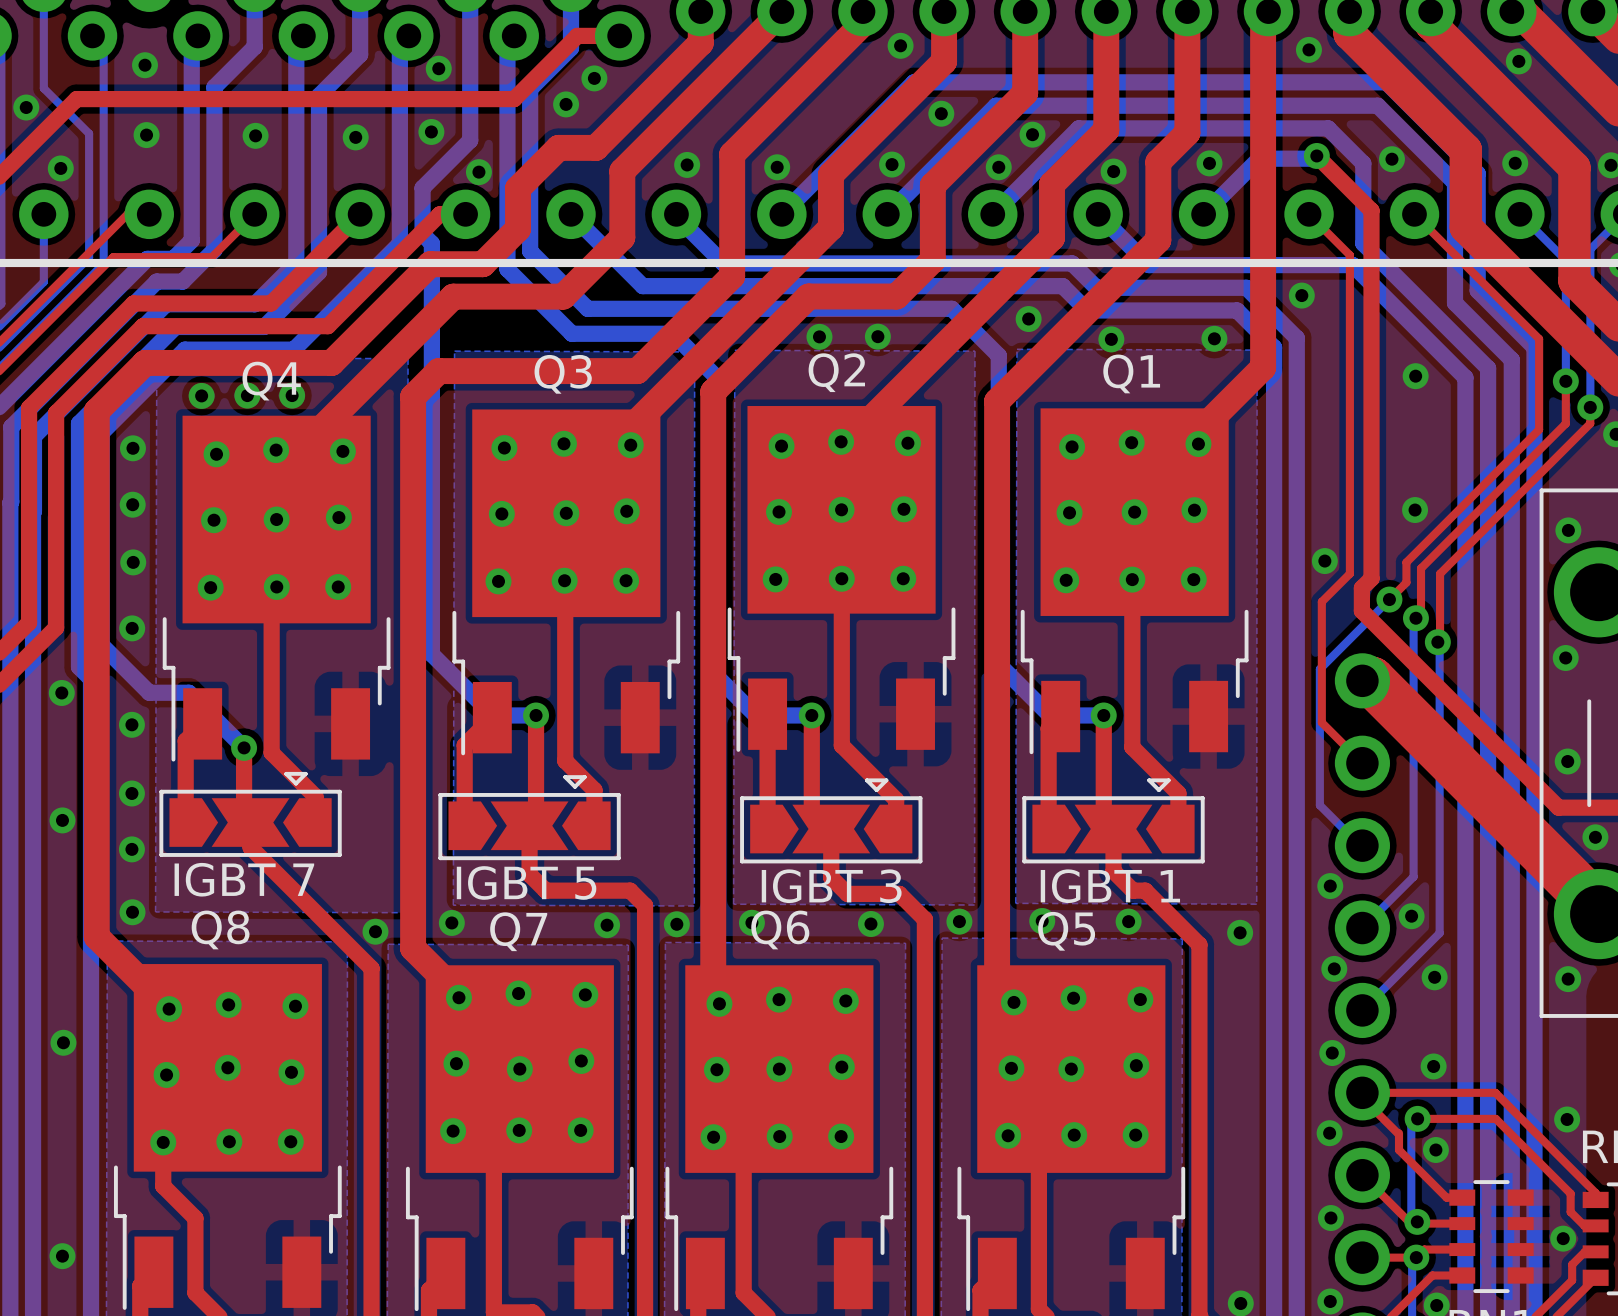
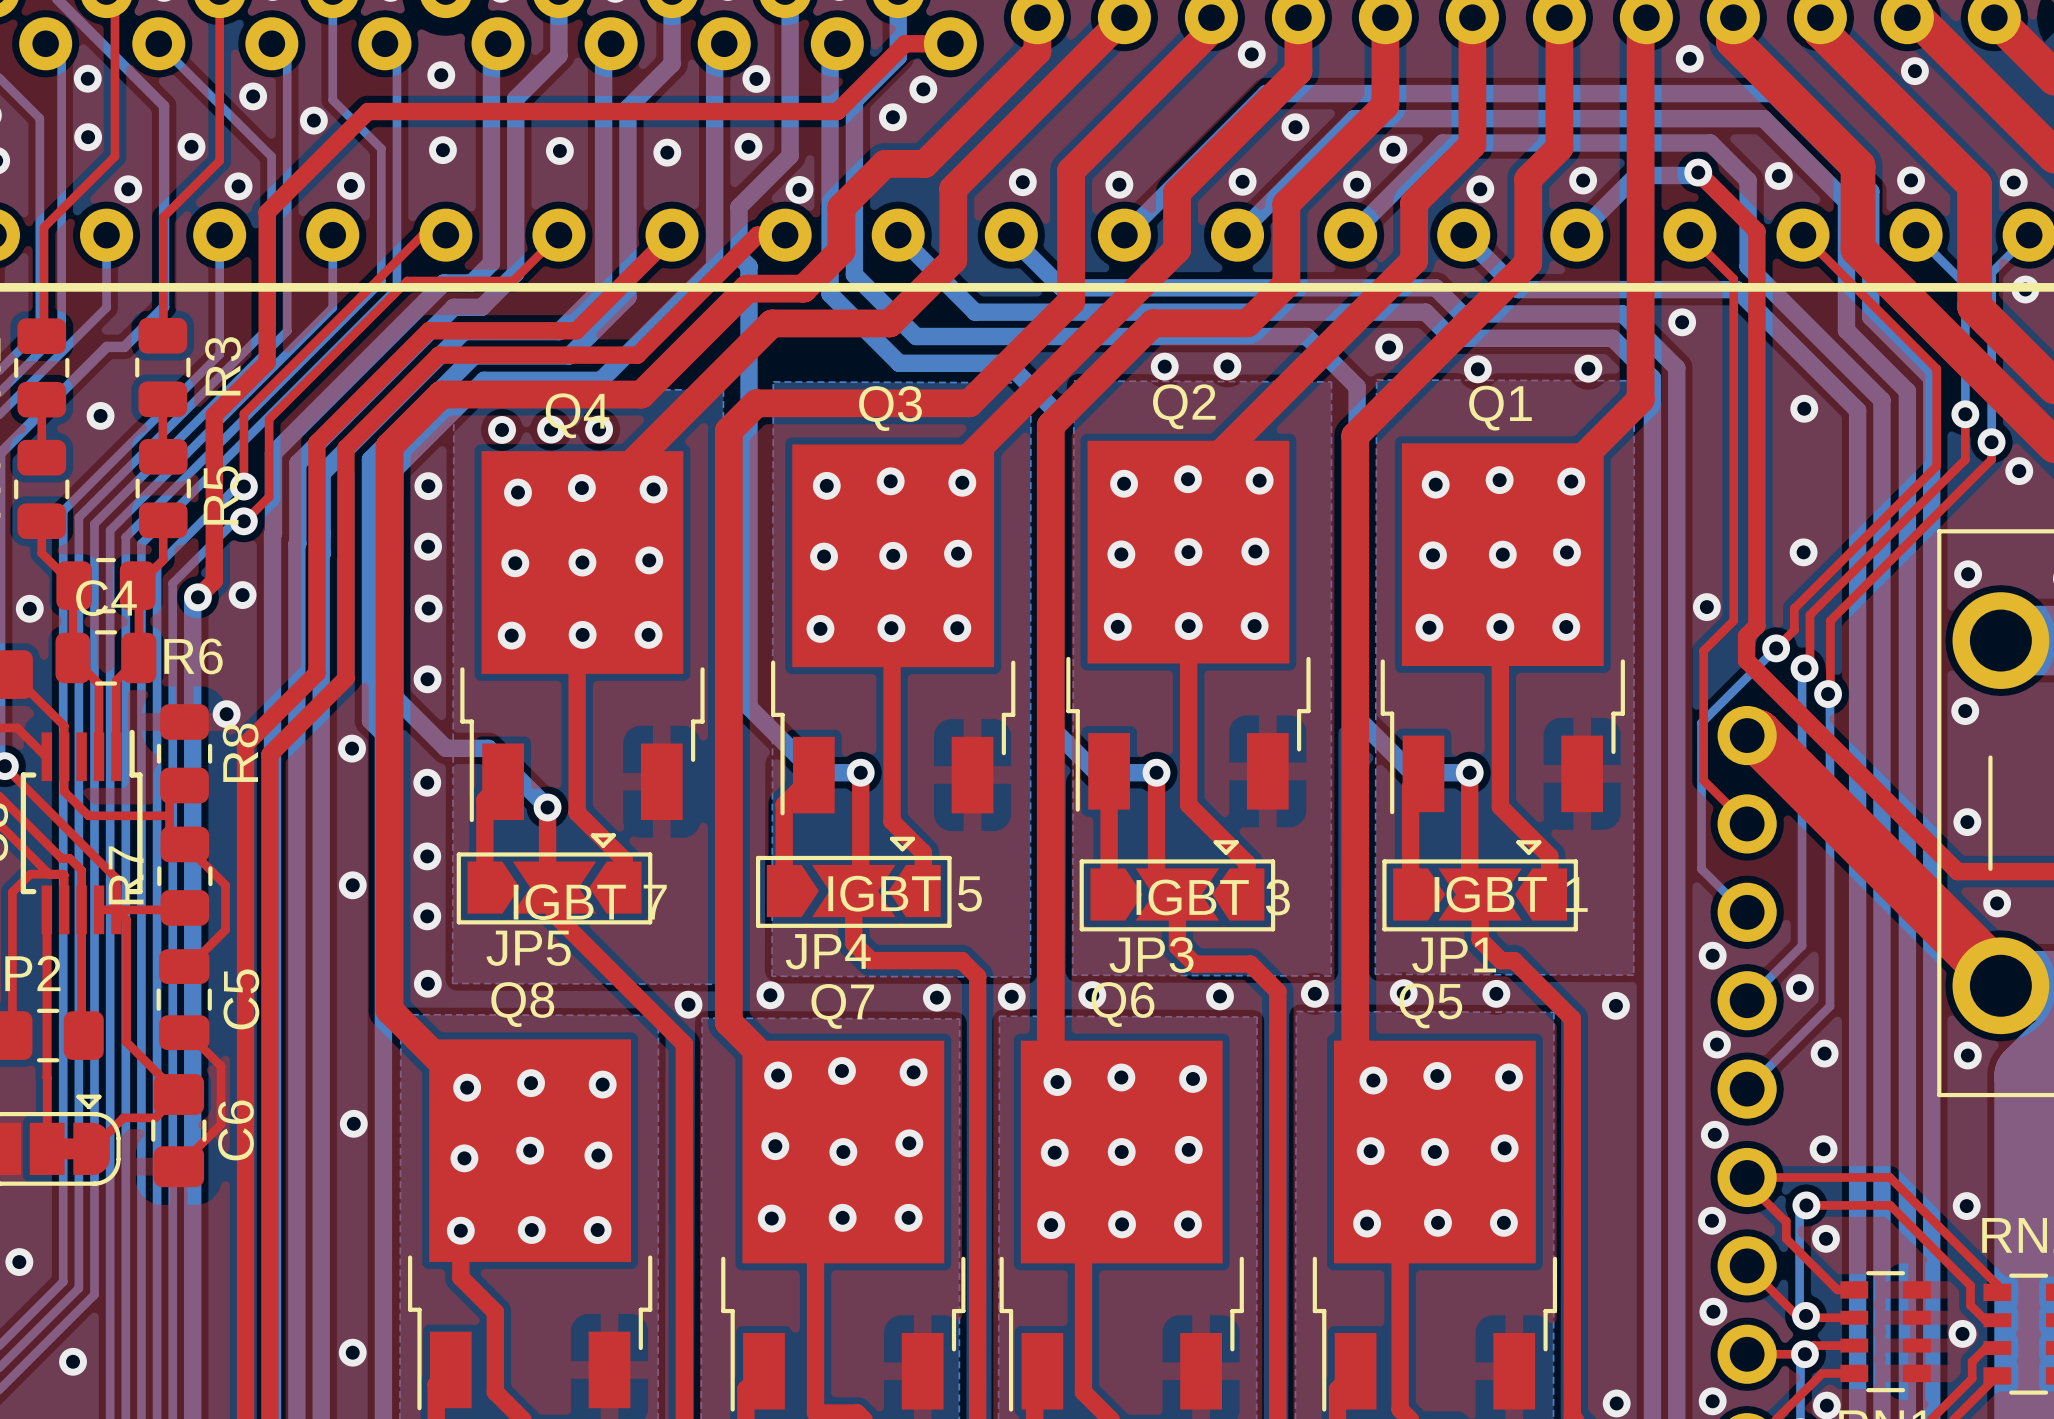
text position: IGBT 7 (244, 879) -> IGBT 7 (590, 902)
text position: IGBT 5 (526, 882) -> IGBT 5 (905, 893)
JP5 name: none -> JP5 (528, 948)
JP4 name: none -> JP4 (828, 951)
text position: IGBT 3 (831, 886) -> IGBT 3 (1213, 897)
text position: IGBT 1 (1110, 886) -> IGBT 1 (1511, 894)
JP3 name: none -> JP3 (1151, 954)
JP1 name: none -> JP1 (1454, 955)

